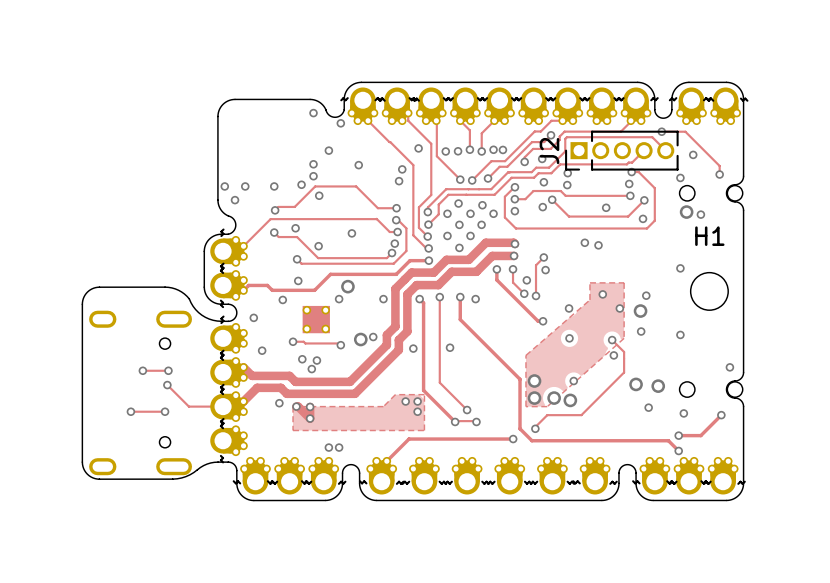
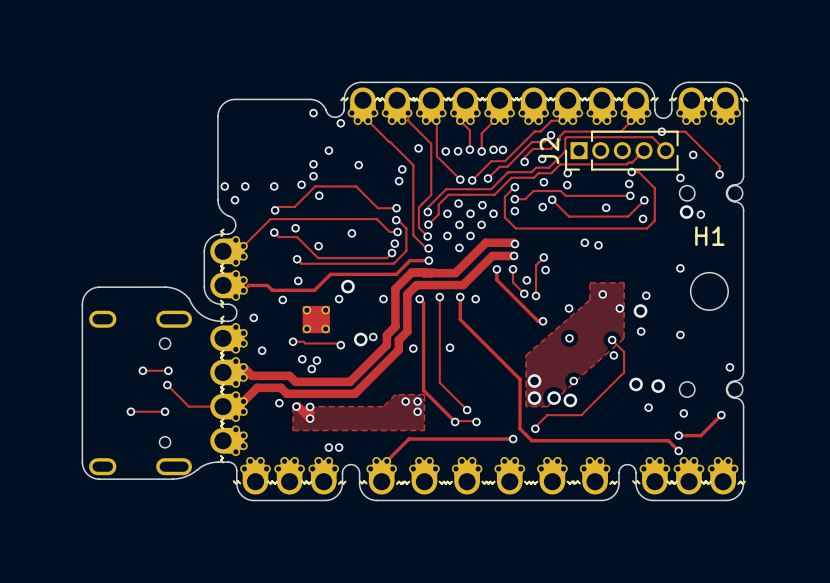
track: (468, 259) (446, 259) (433, 272) -> (468, 259) (455, 273) (422, 275)
track: (476, 271) (451, 271) (438, 285) -> (476, 271) (463, 285) (438, 285)

